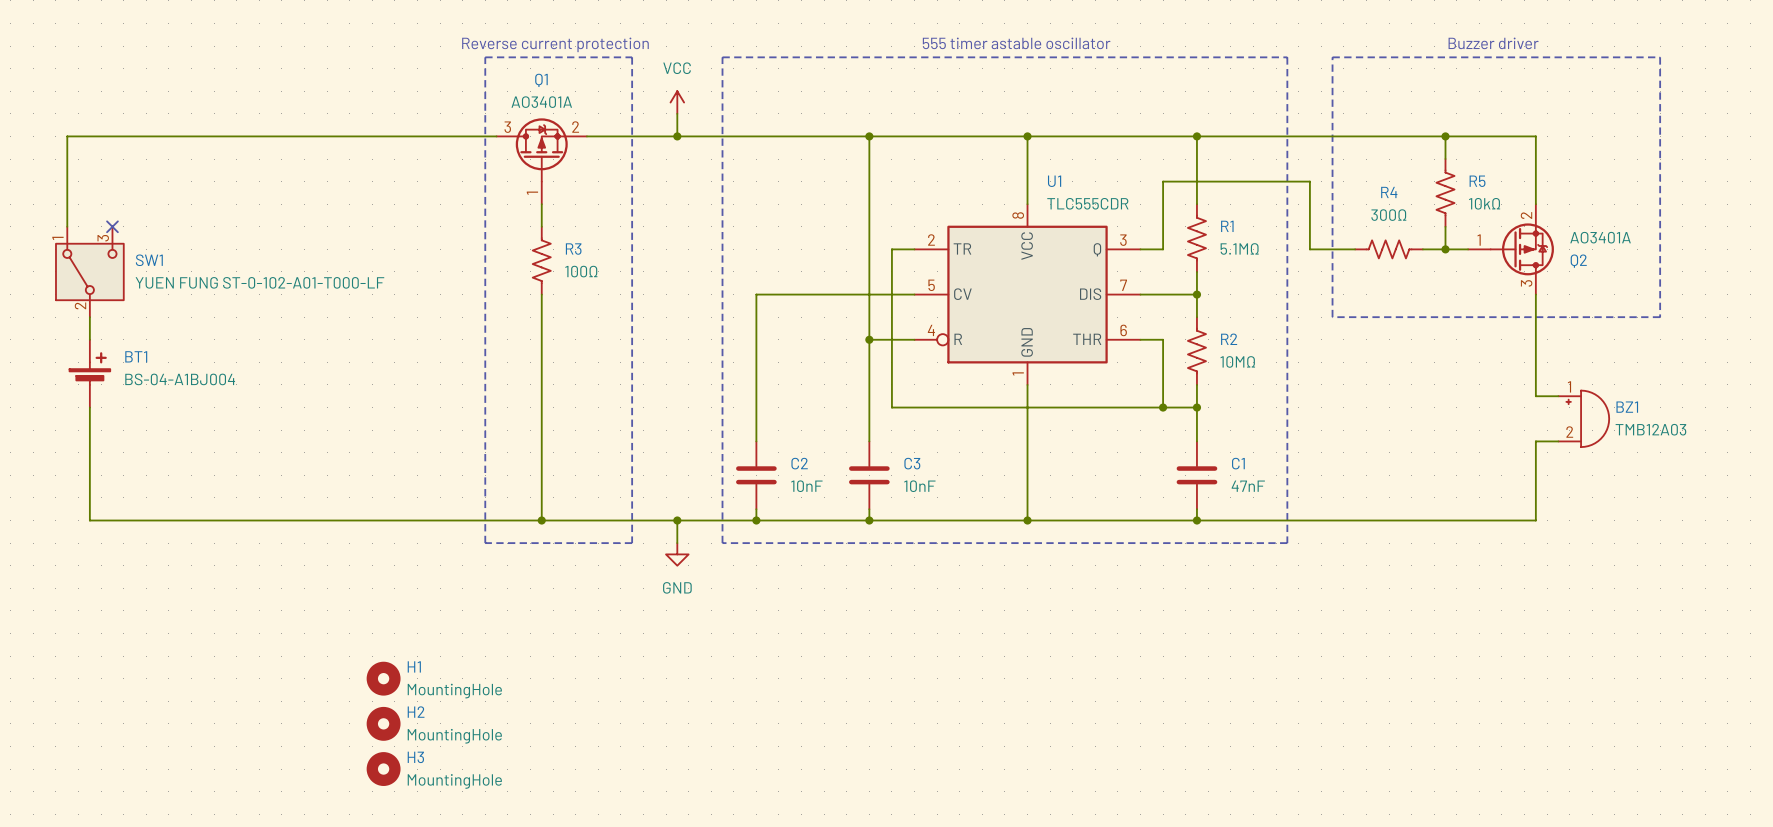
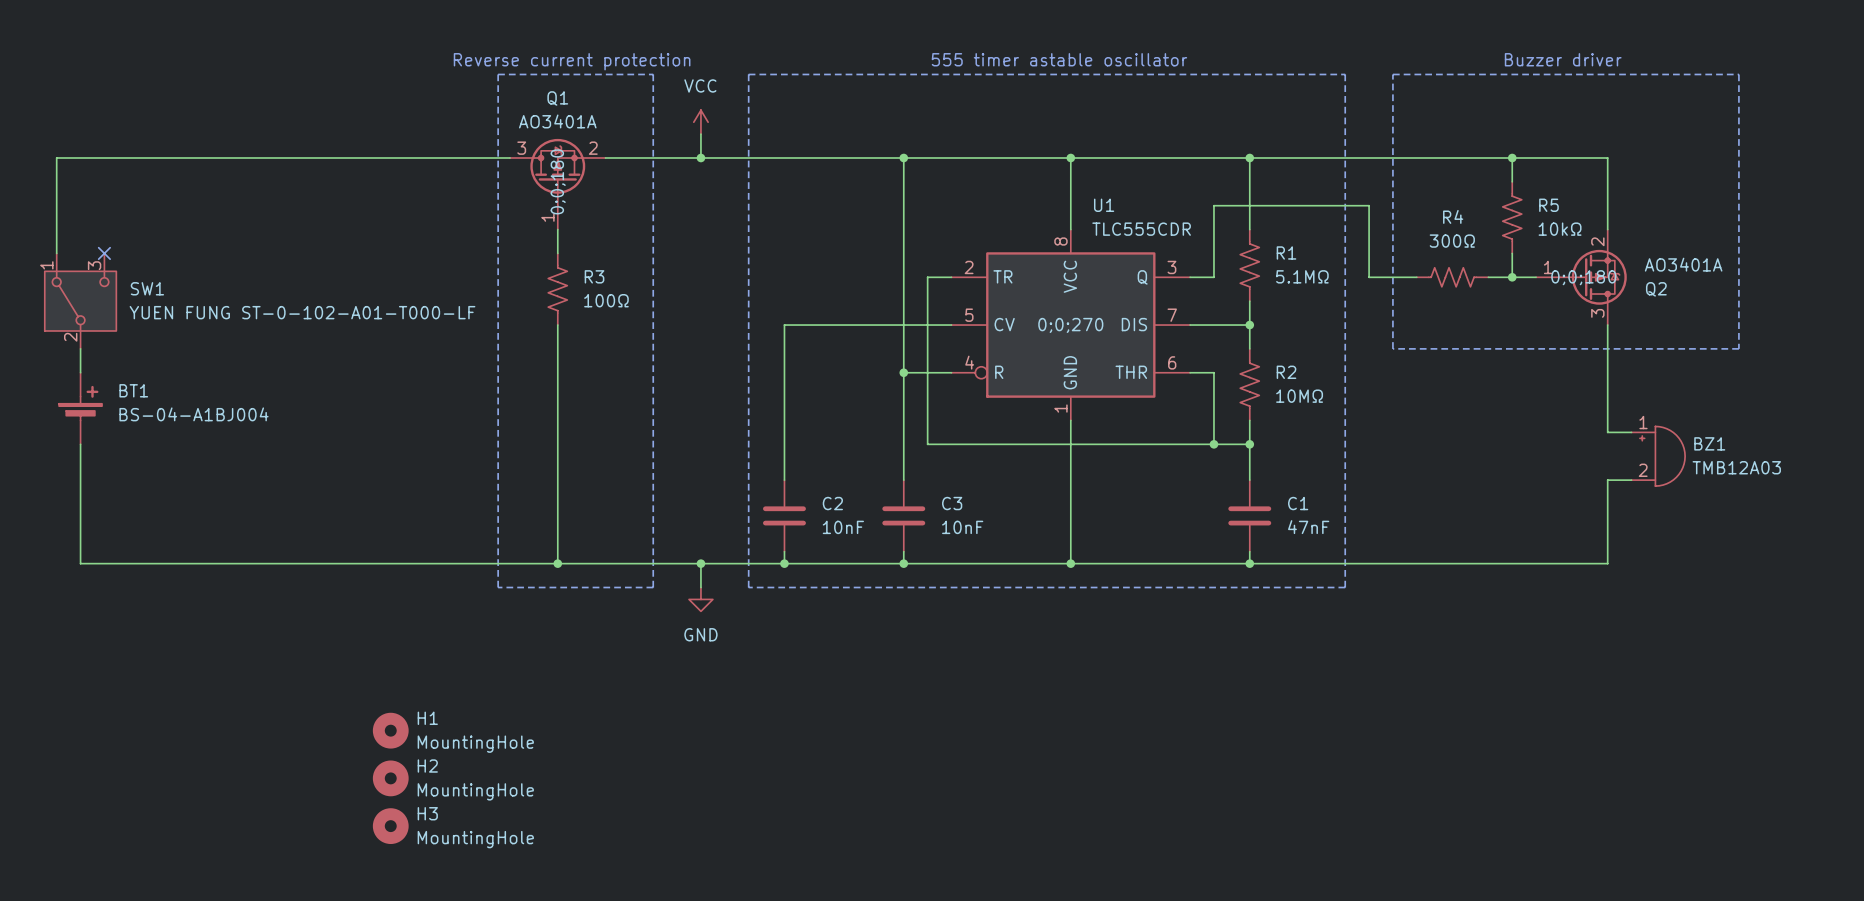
Q1 text: none -> 0;0;180 (558, 181)
Q2 text: none -> 0;0;180 (1583, 277)
U1 text: none -> 0;0;270 (1070, 325)

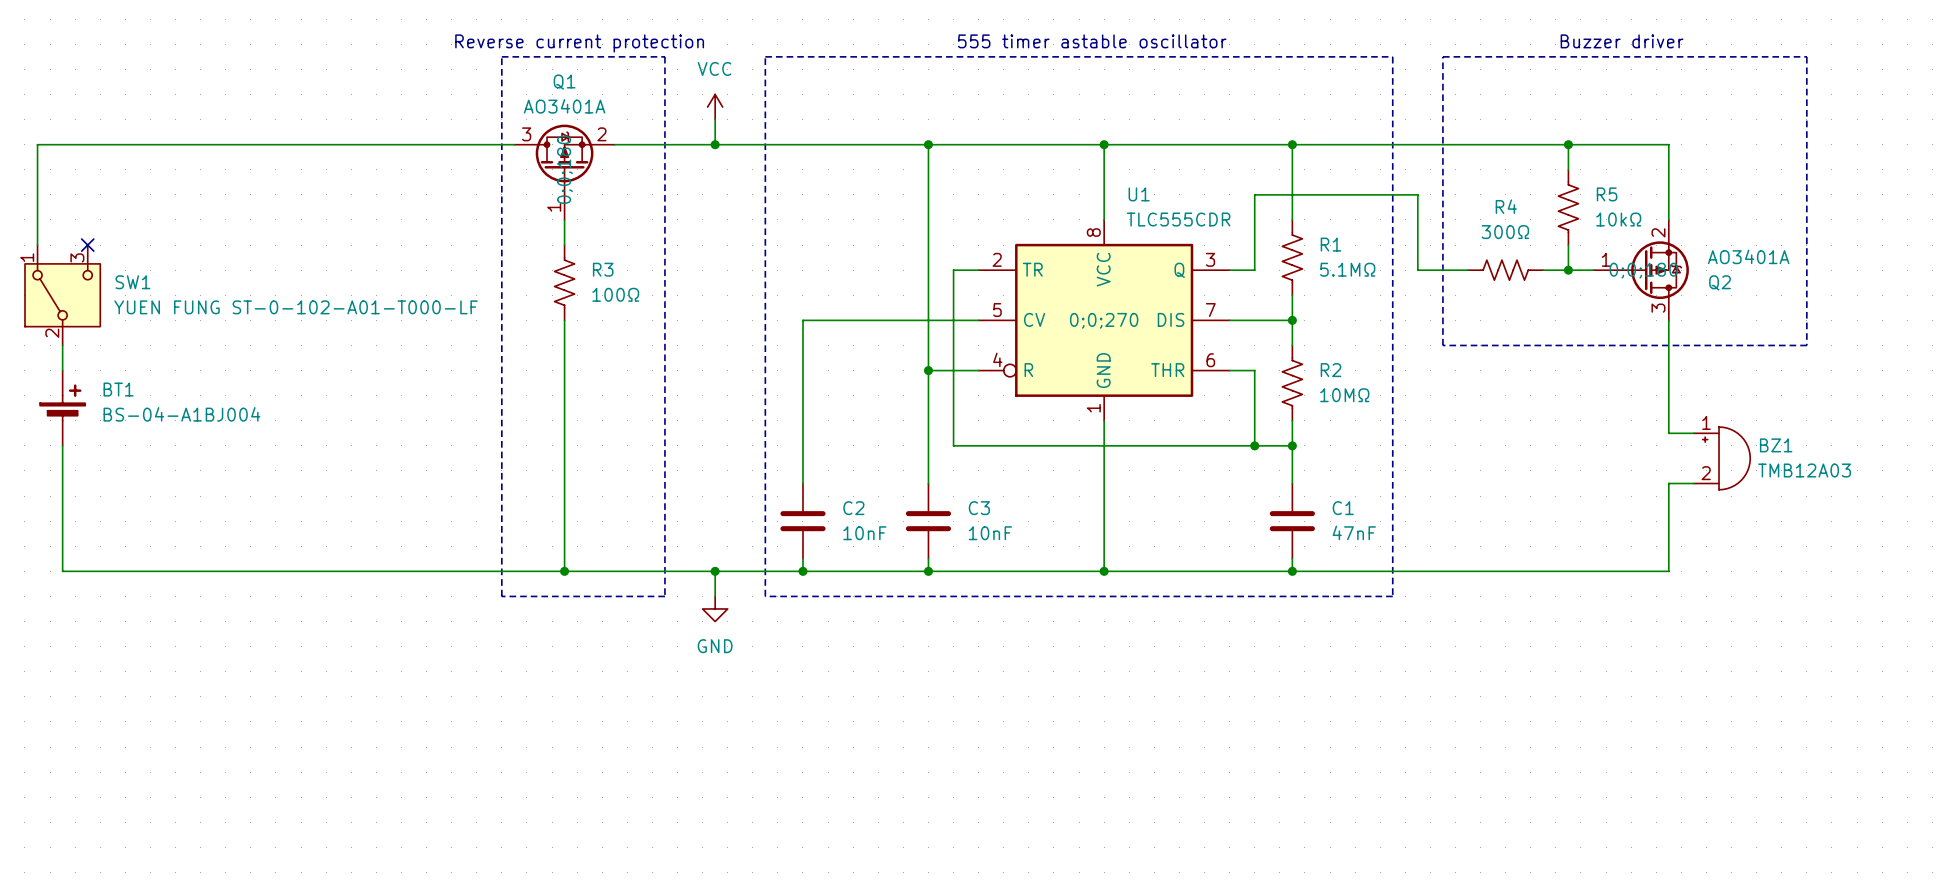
H1: MountingHole (390, 730) -> none
H2: MountingHole (390, 778) -> none
H3: MountingHole (390, 826) -> none

